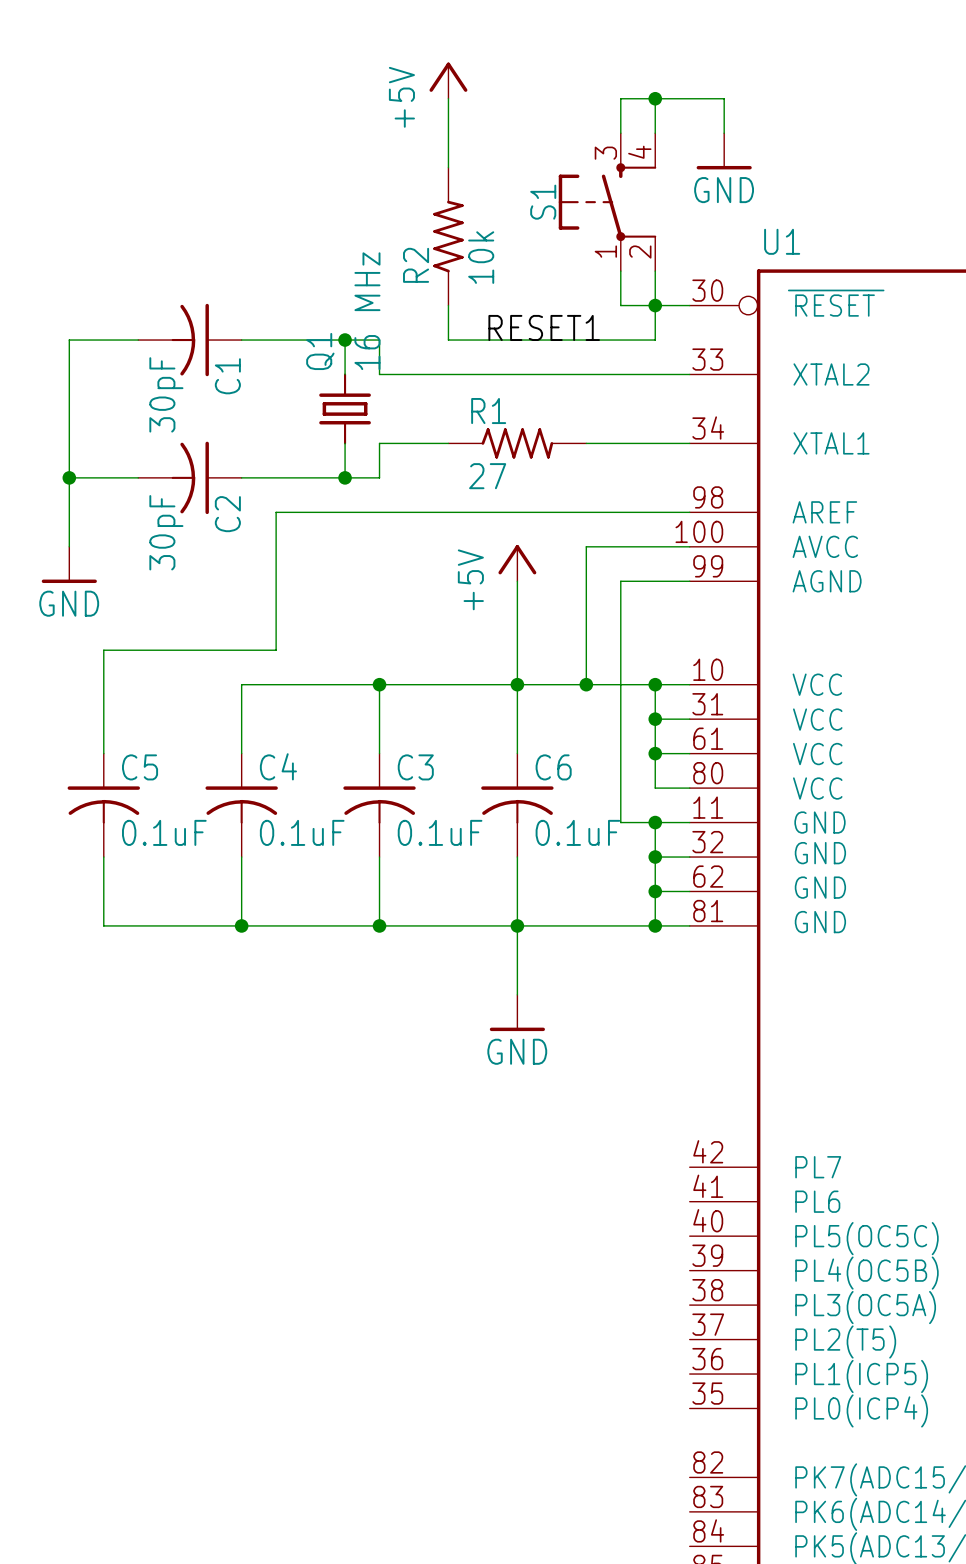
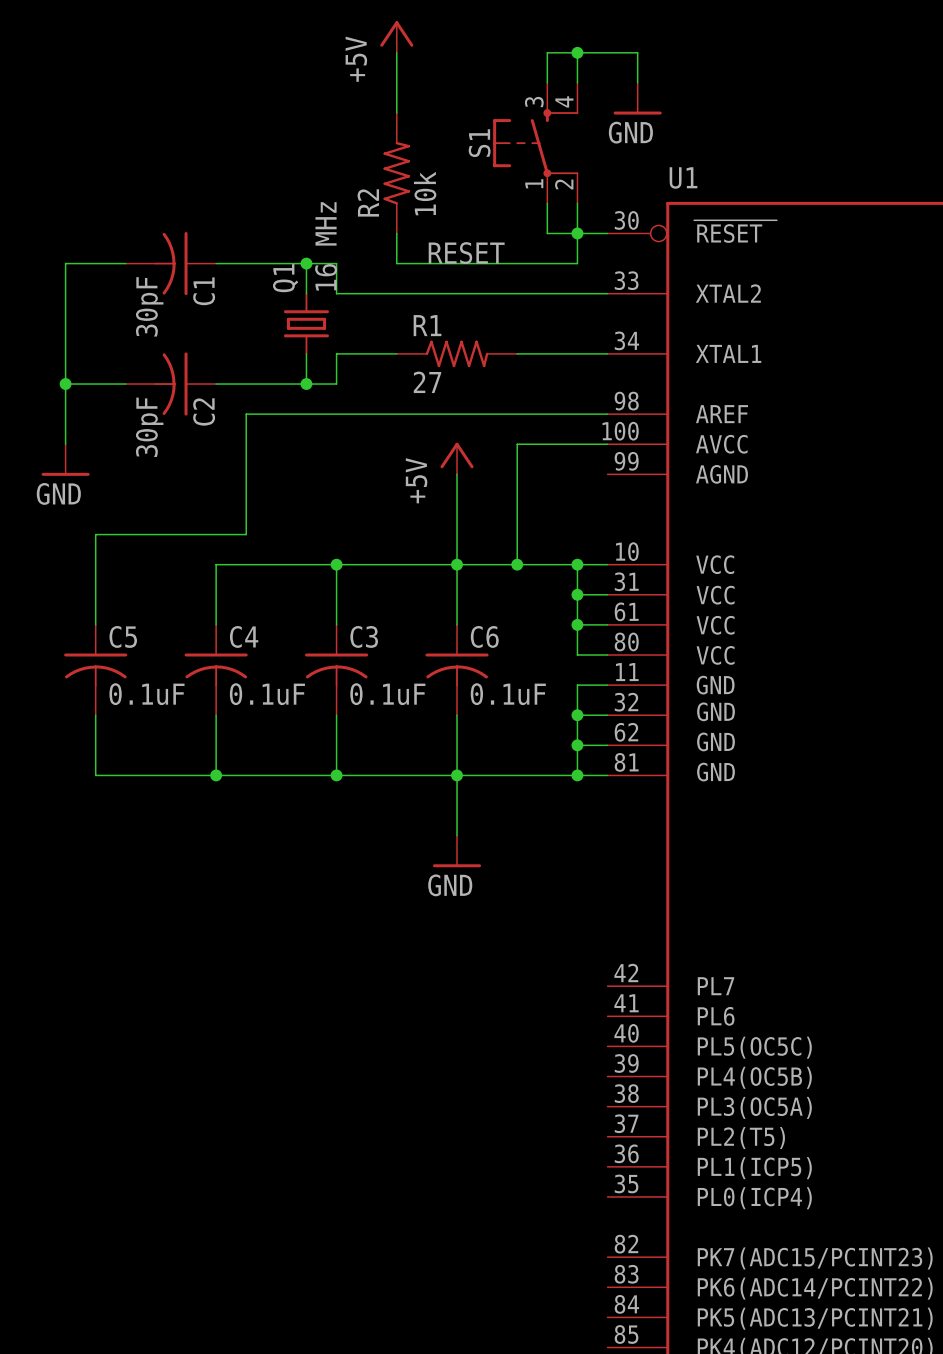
label: RESET1 (544, 327) -> RESET (466, 253)
wire: (689, 581) (620, 581) (620, 822) (655, 822) -> none
junction: (655, 822) -> none

